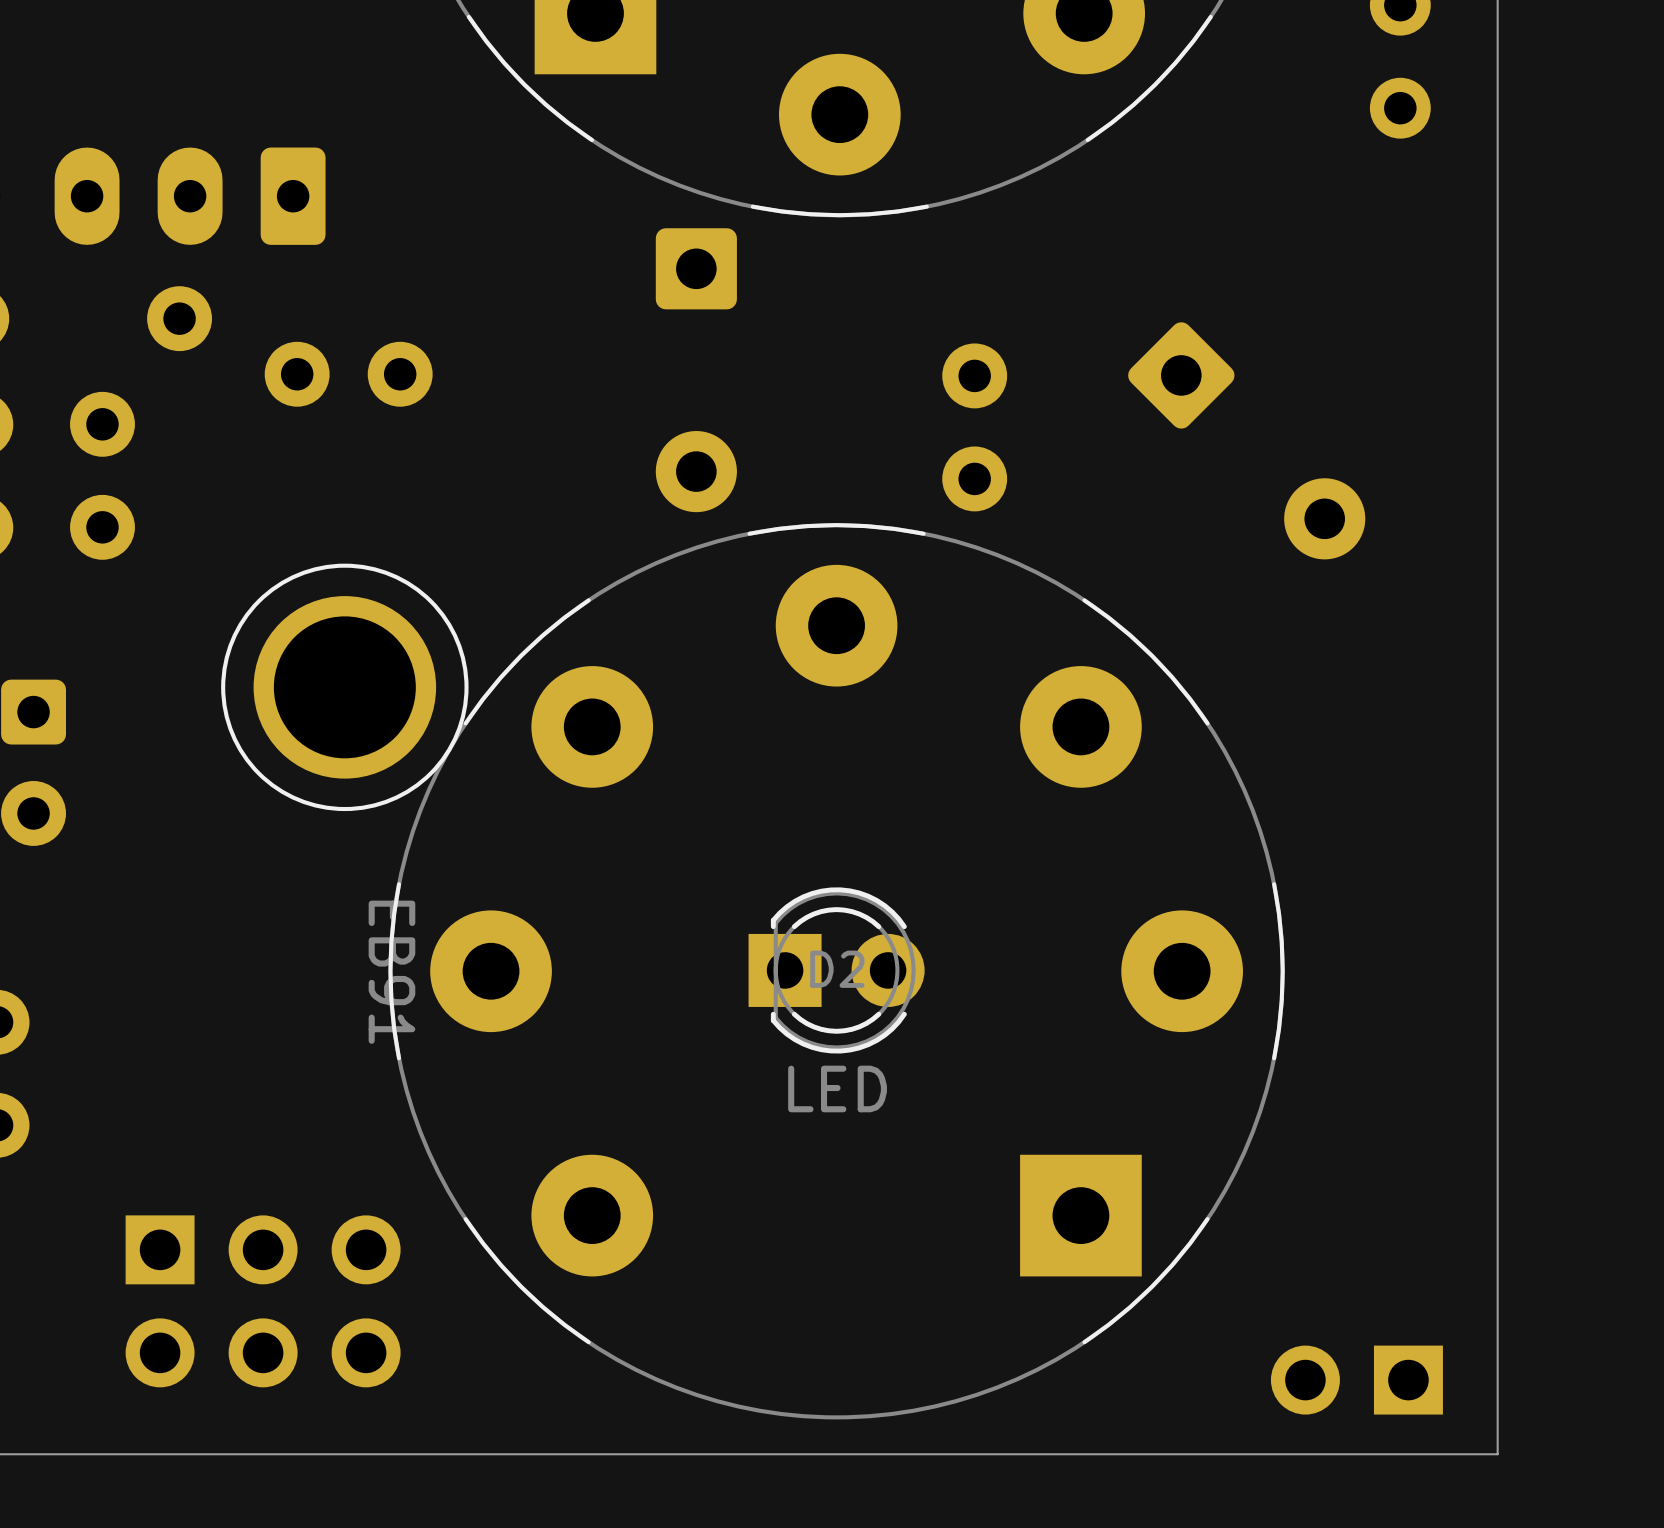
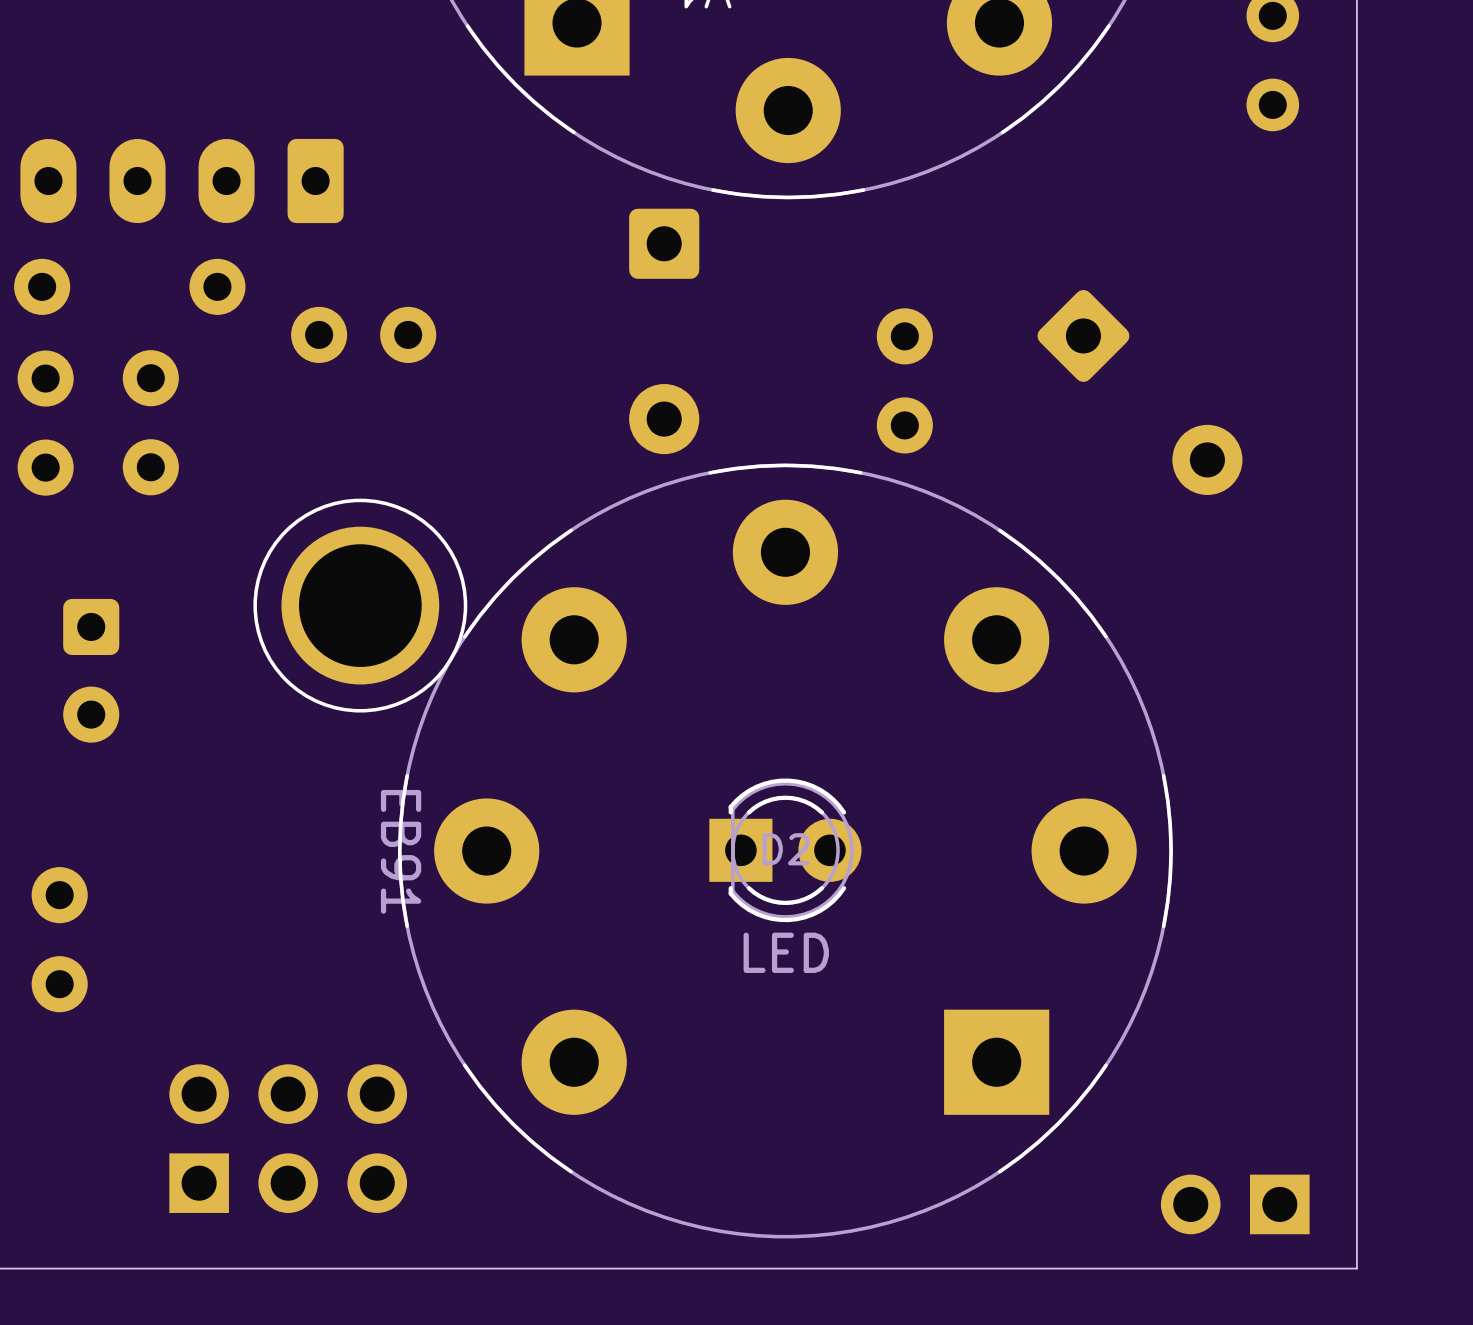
part footprint: [125, 1215, 401, 1388] -> [169, 1064, 408, 1213]

